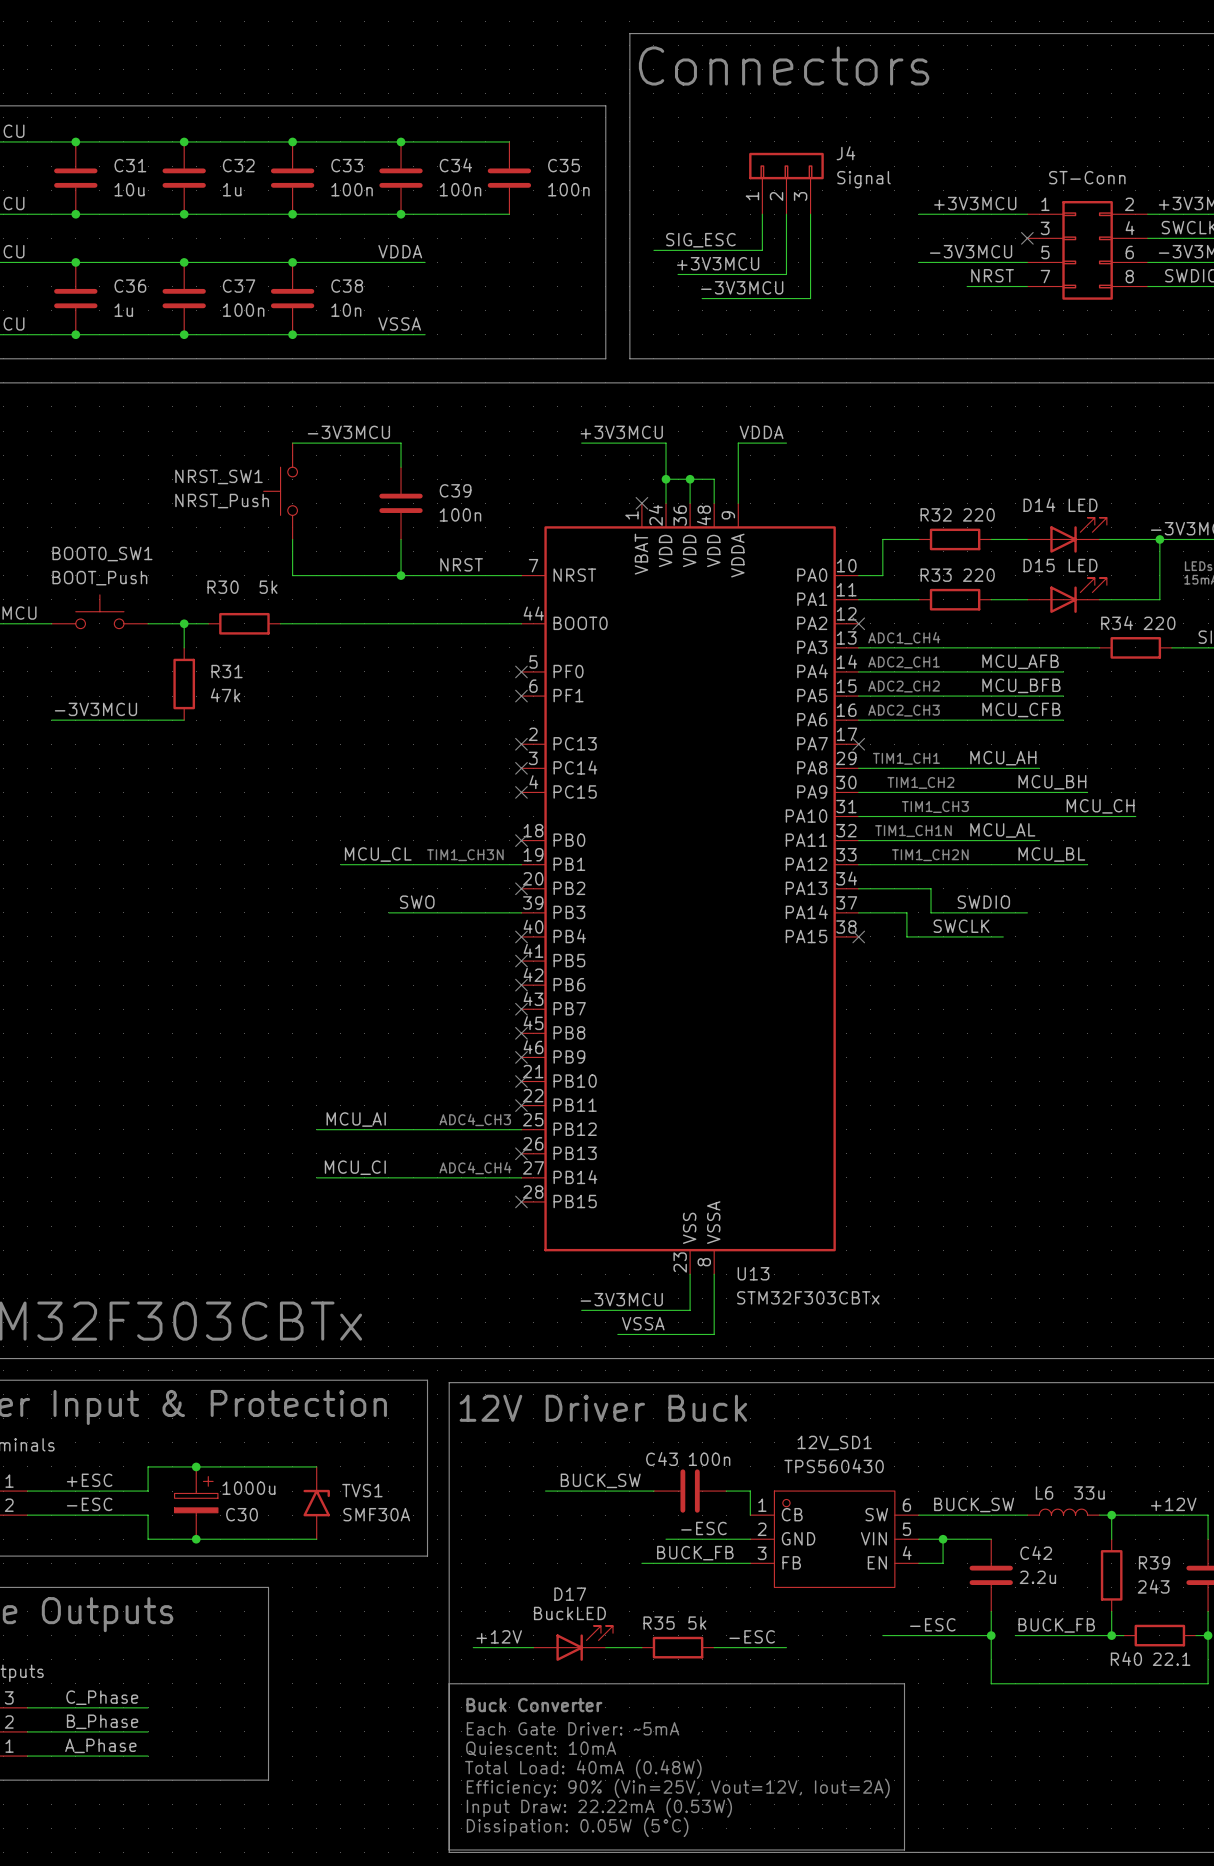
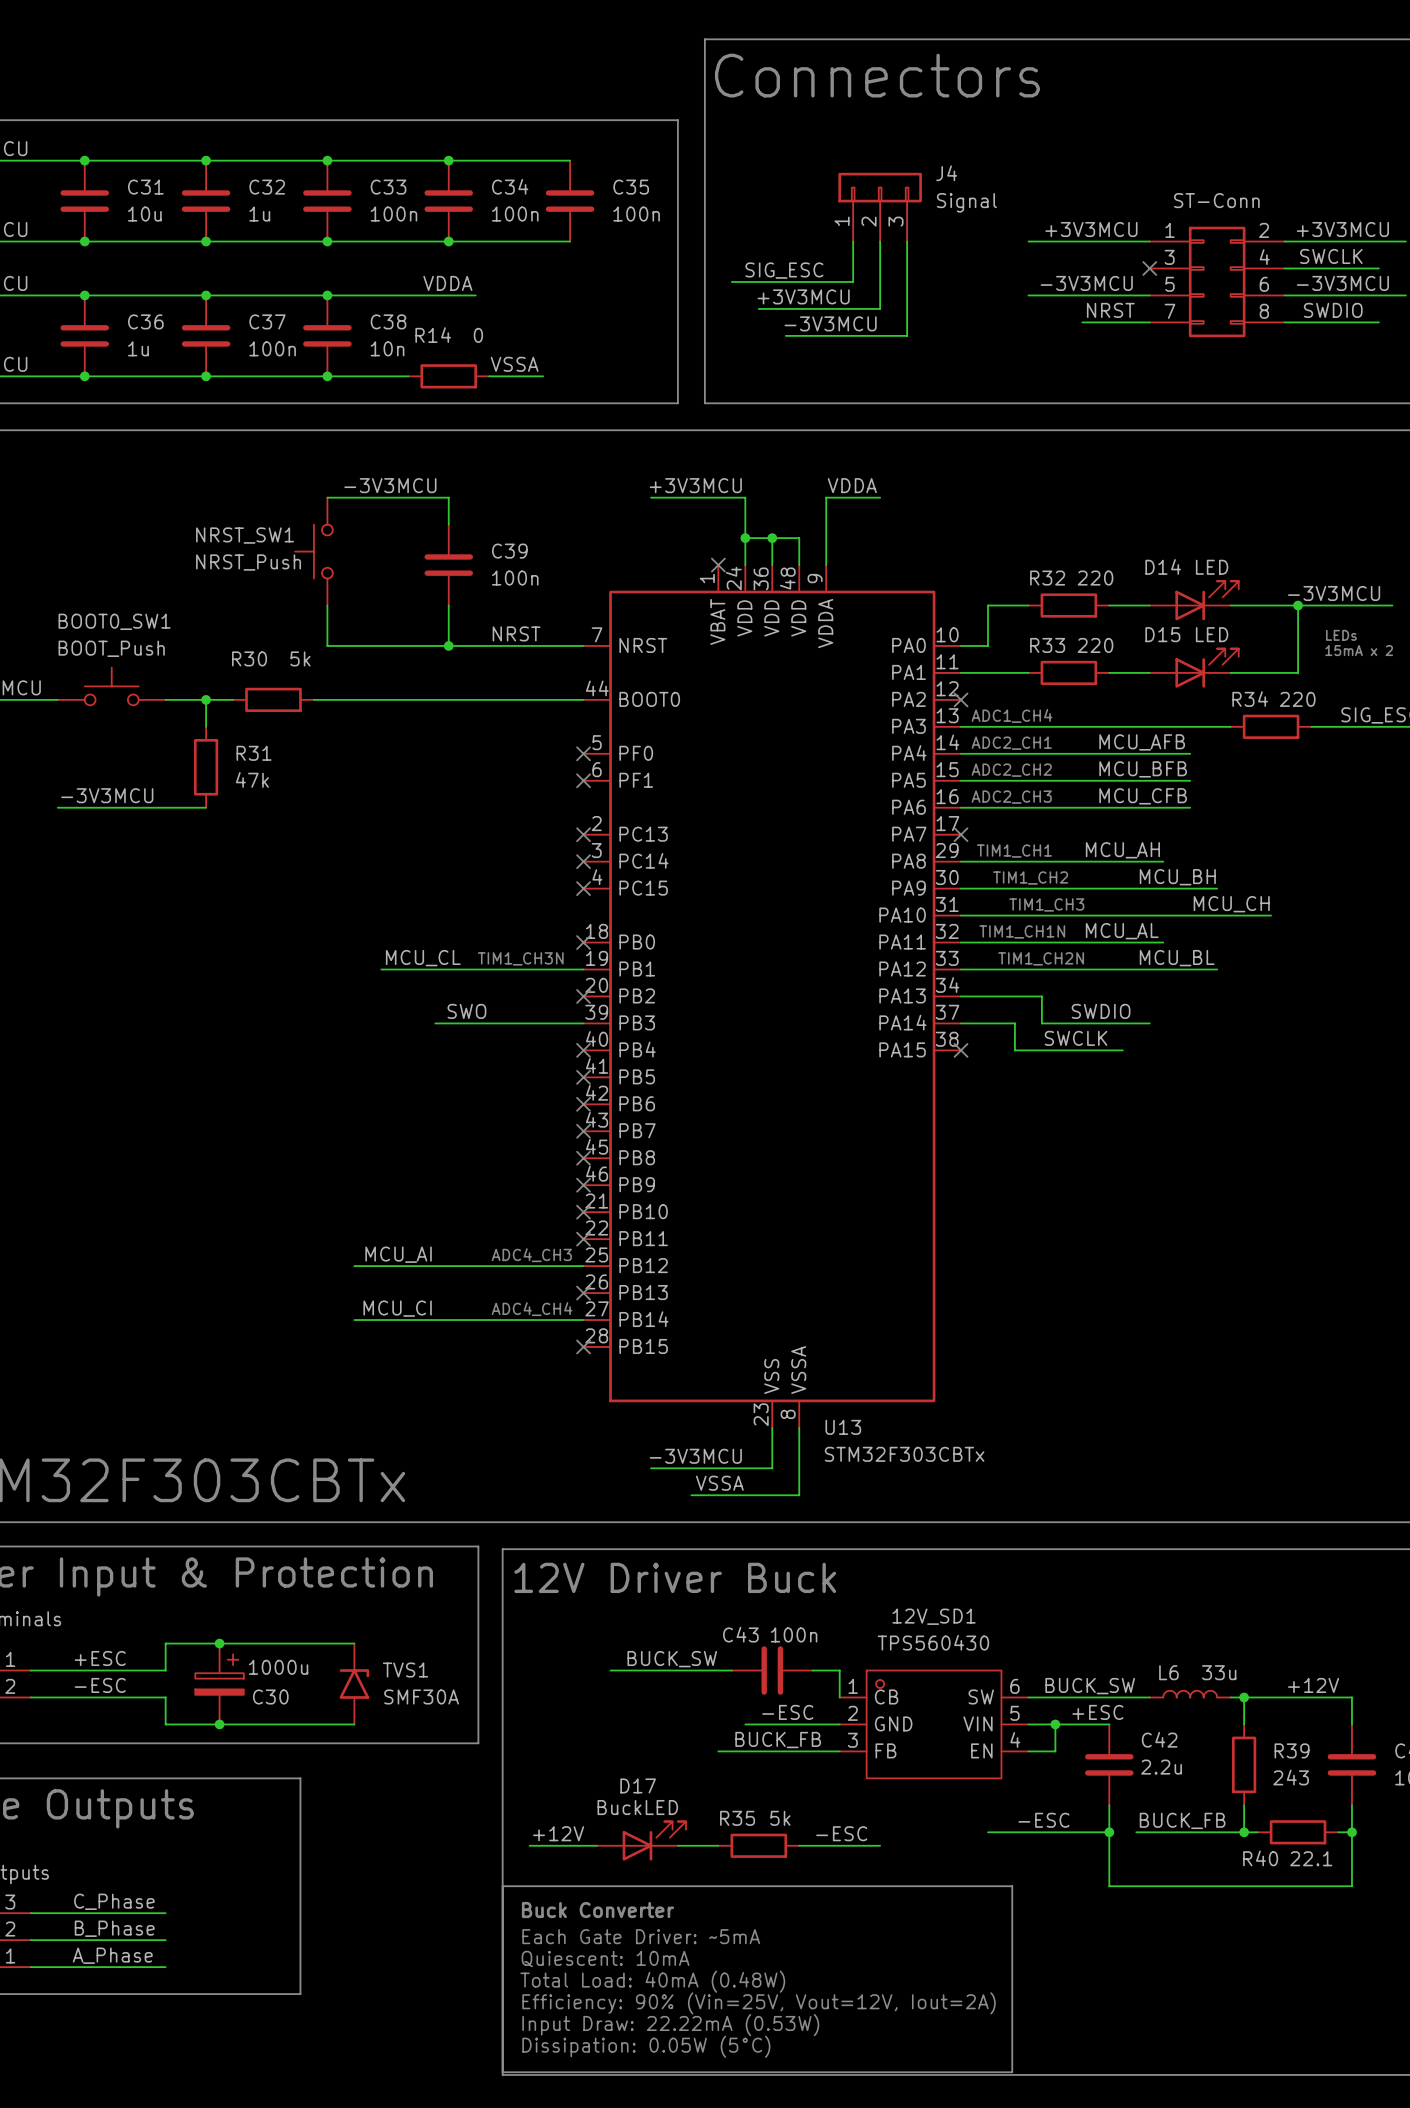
label position: VSSA (399, 323) -> VSSA (514, 364)
wire: (364, 334) (425, 334) -> none
R14: none -> 0 (448, 376)
wire: none -> (489, 376) (543, 376)
label: none -> +ESC (1097, 1712)

